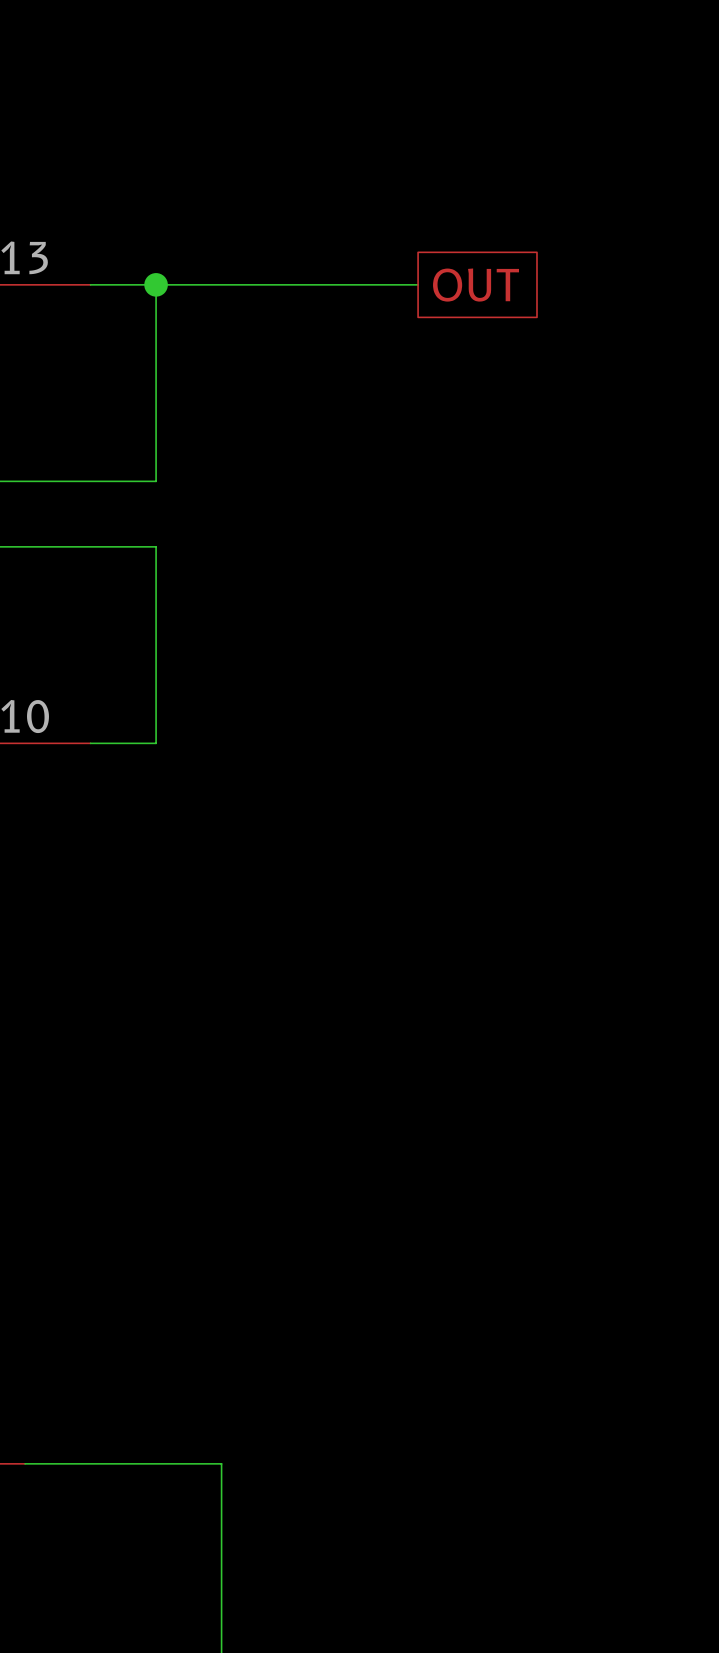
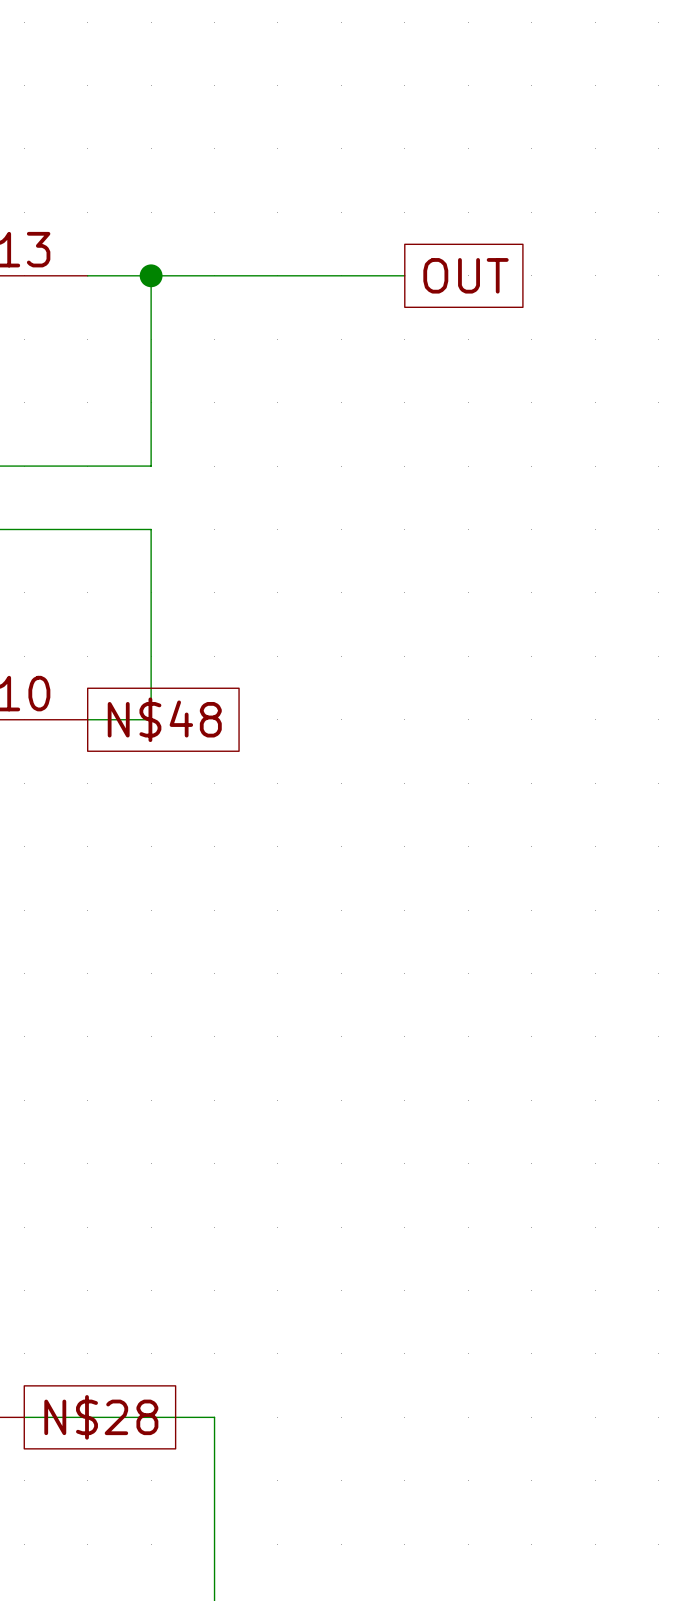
global label: none -> N$48 (164, 719)
global label: none -> N$28 (101, 1417)

